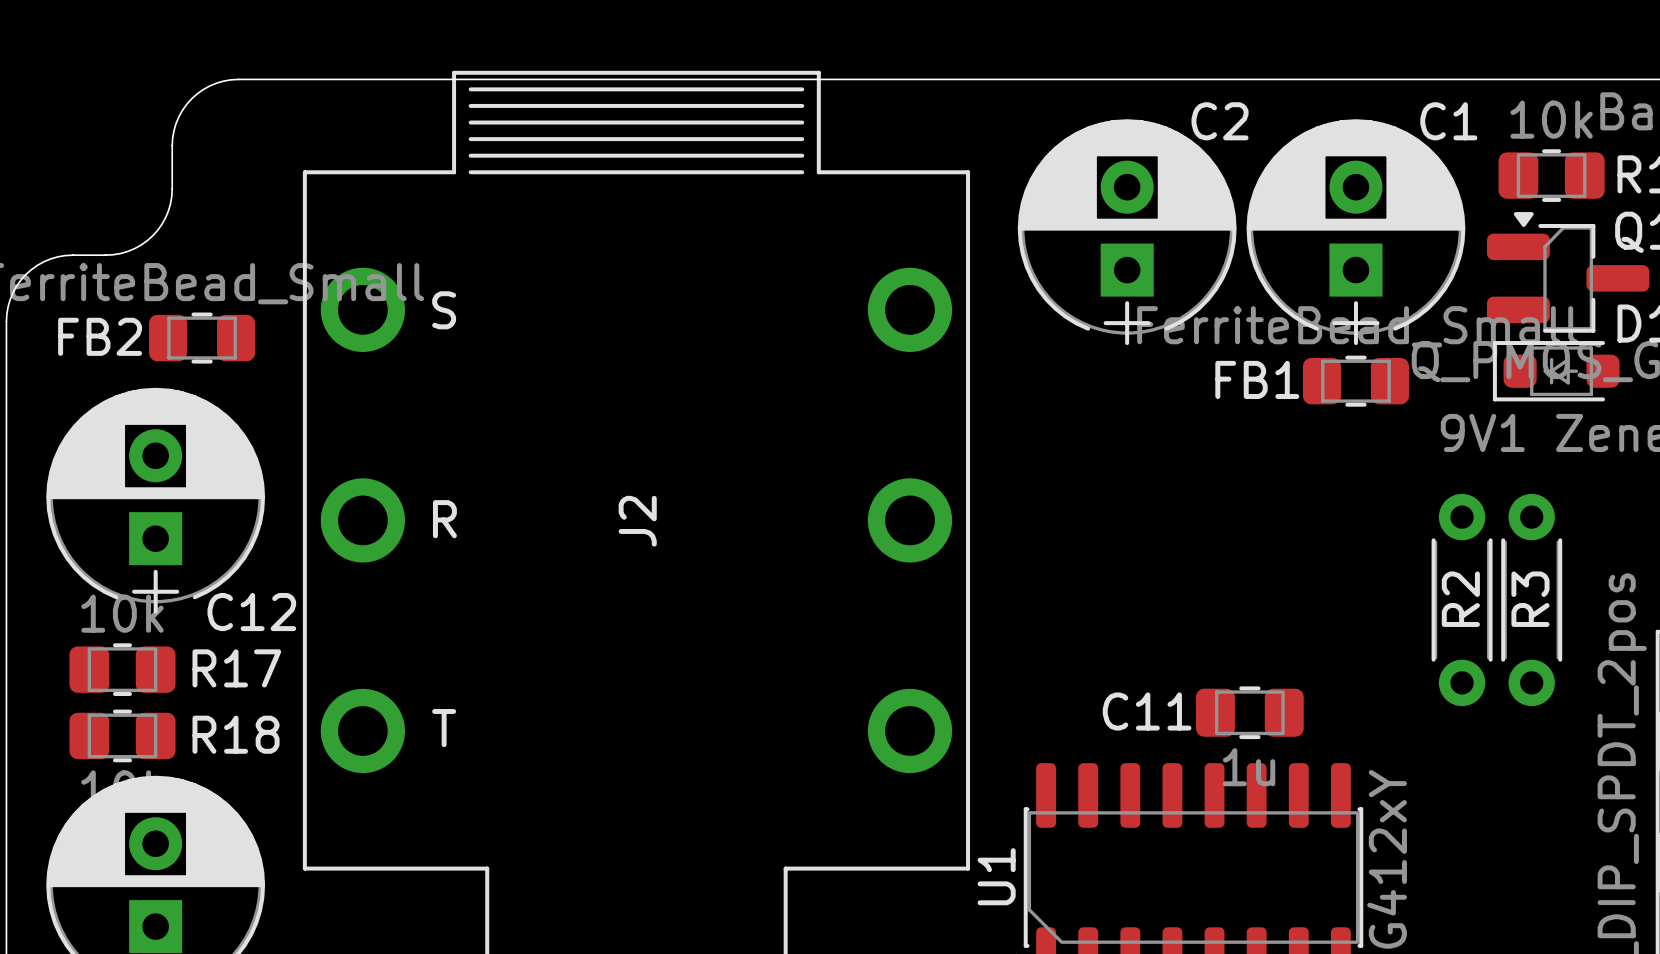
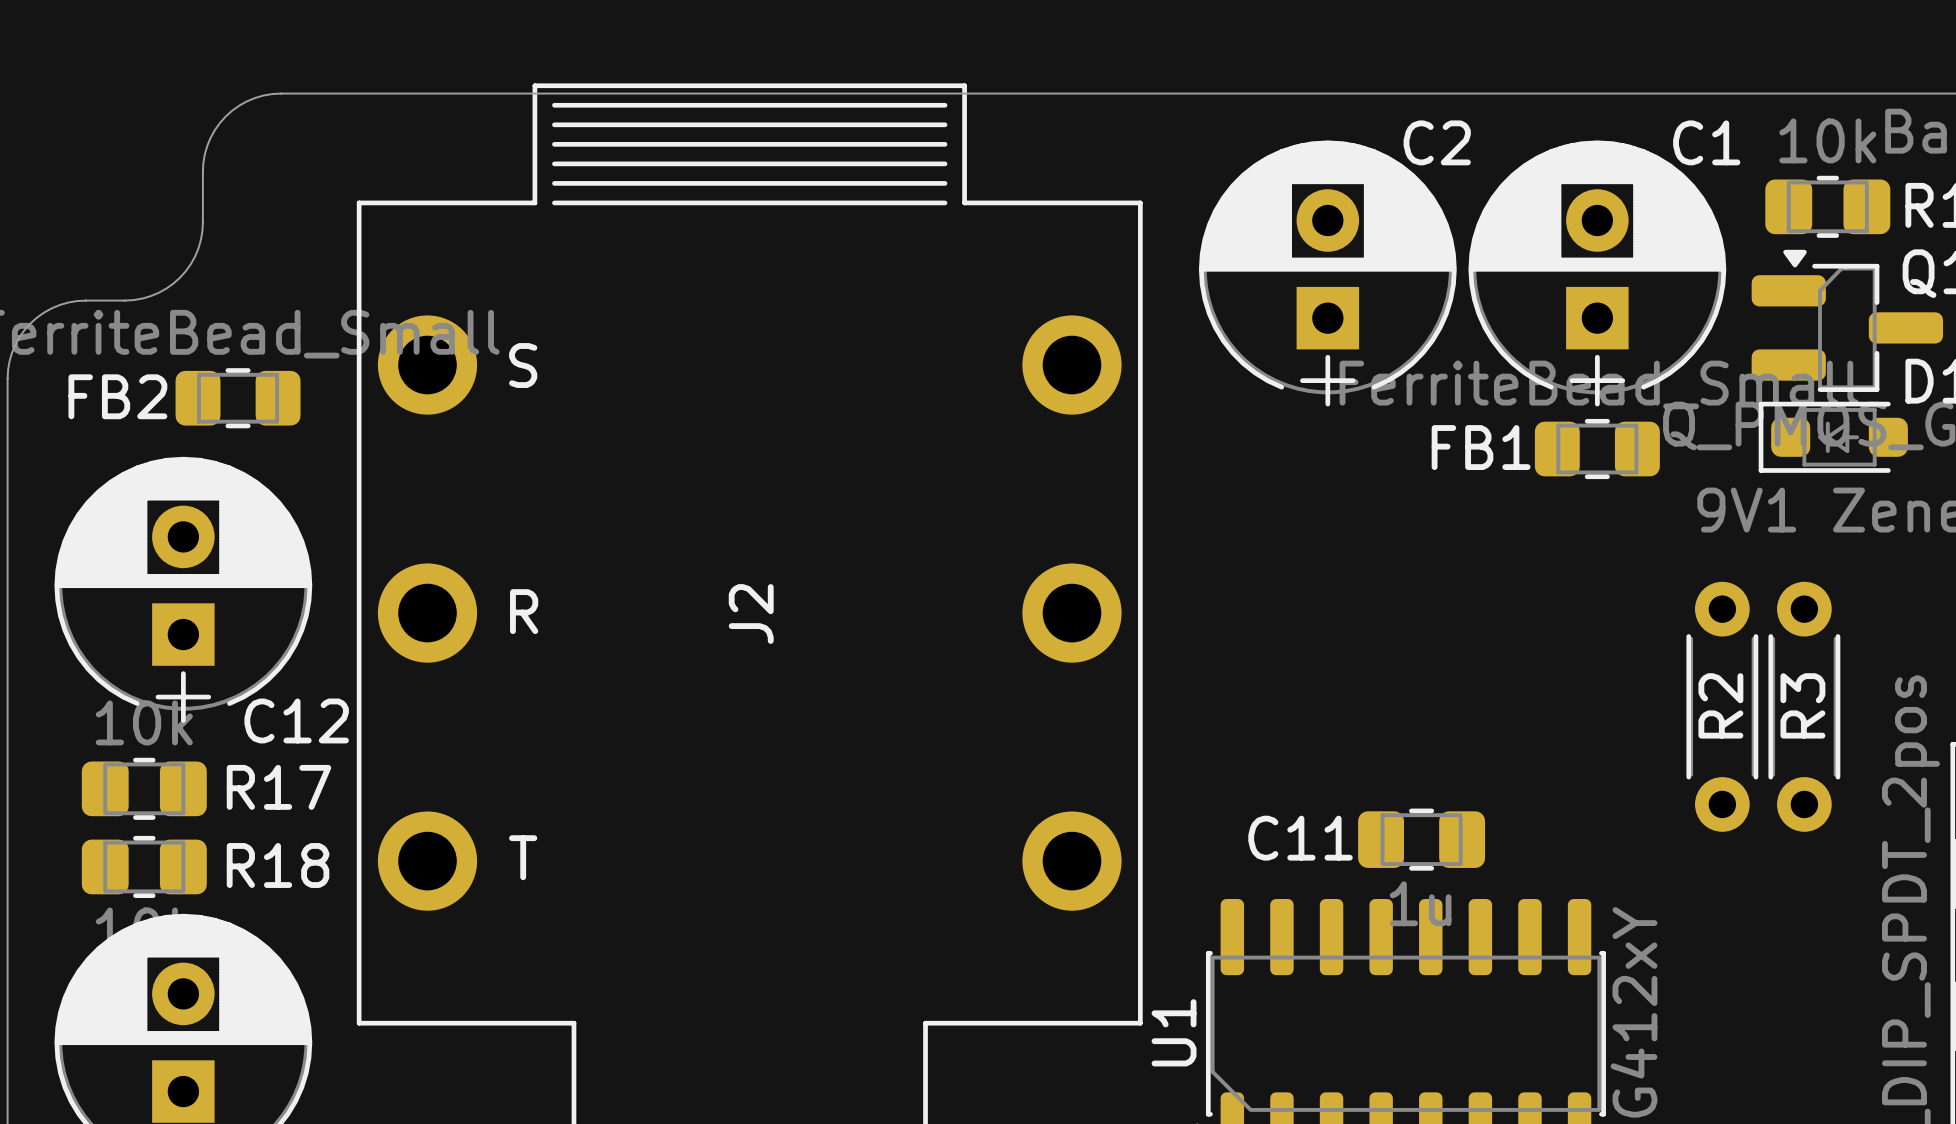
C11 position: (1249, 712) -> (1421, 839)

